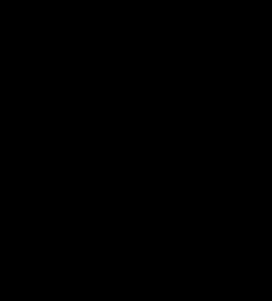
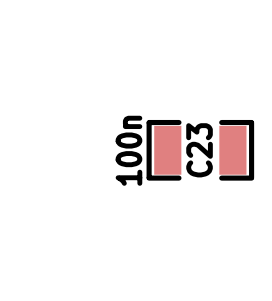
C23: none -> 100n (200, 150)

